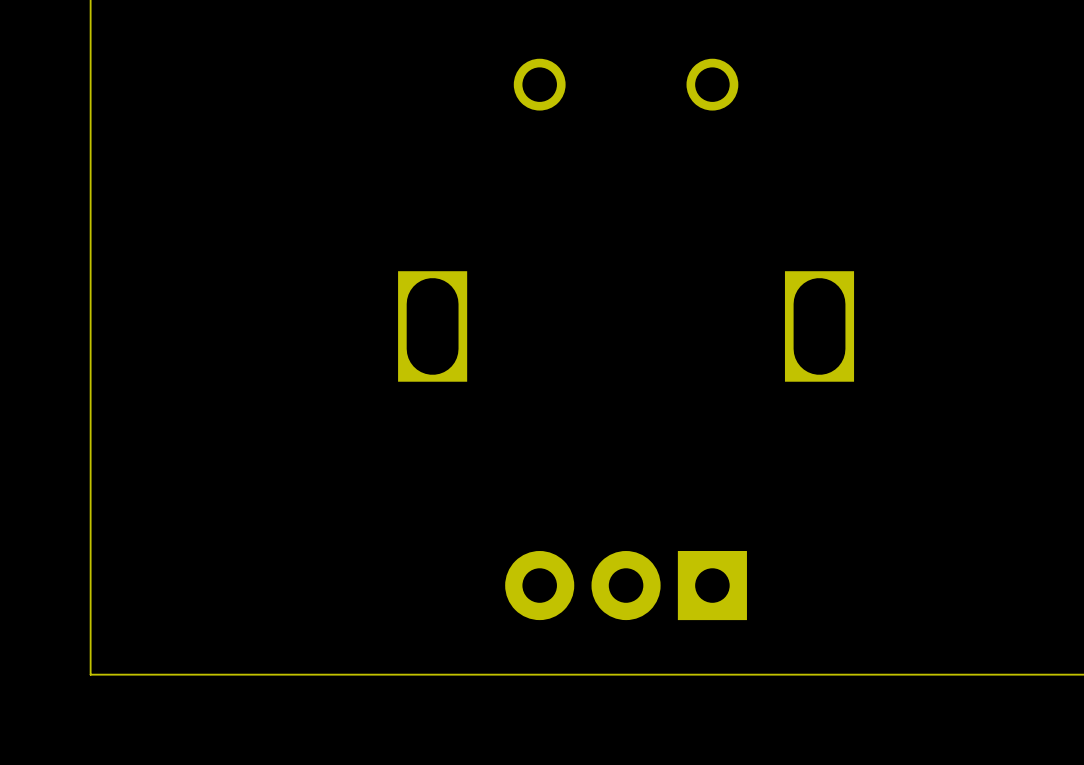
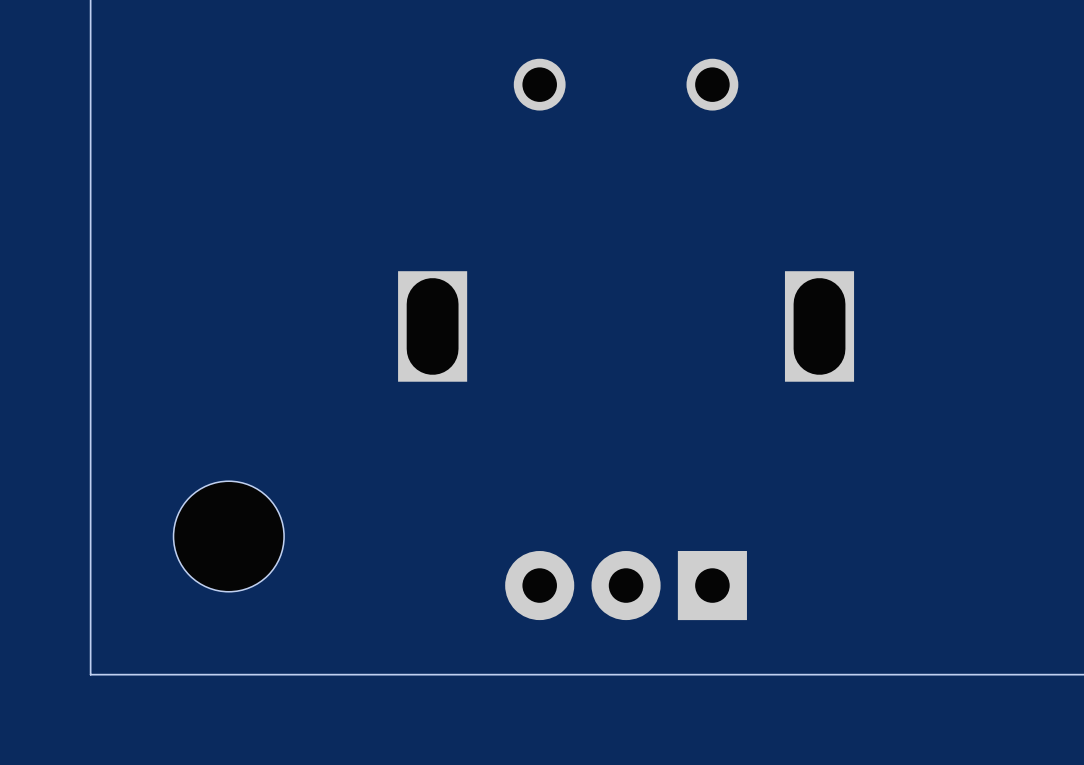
part: none -> (228, 536)

